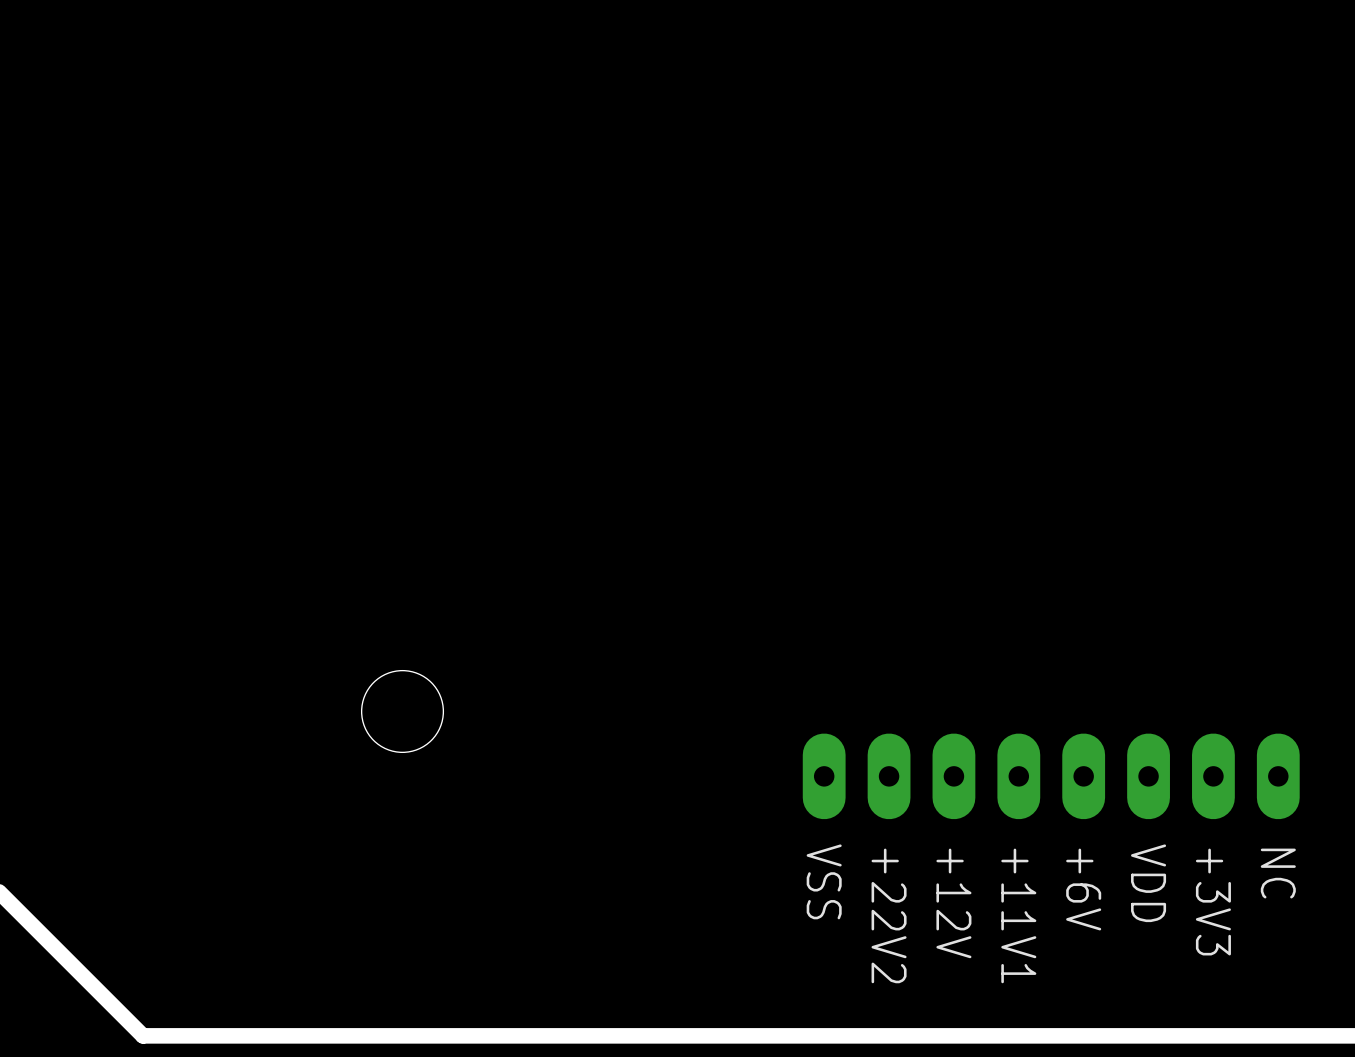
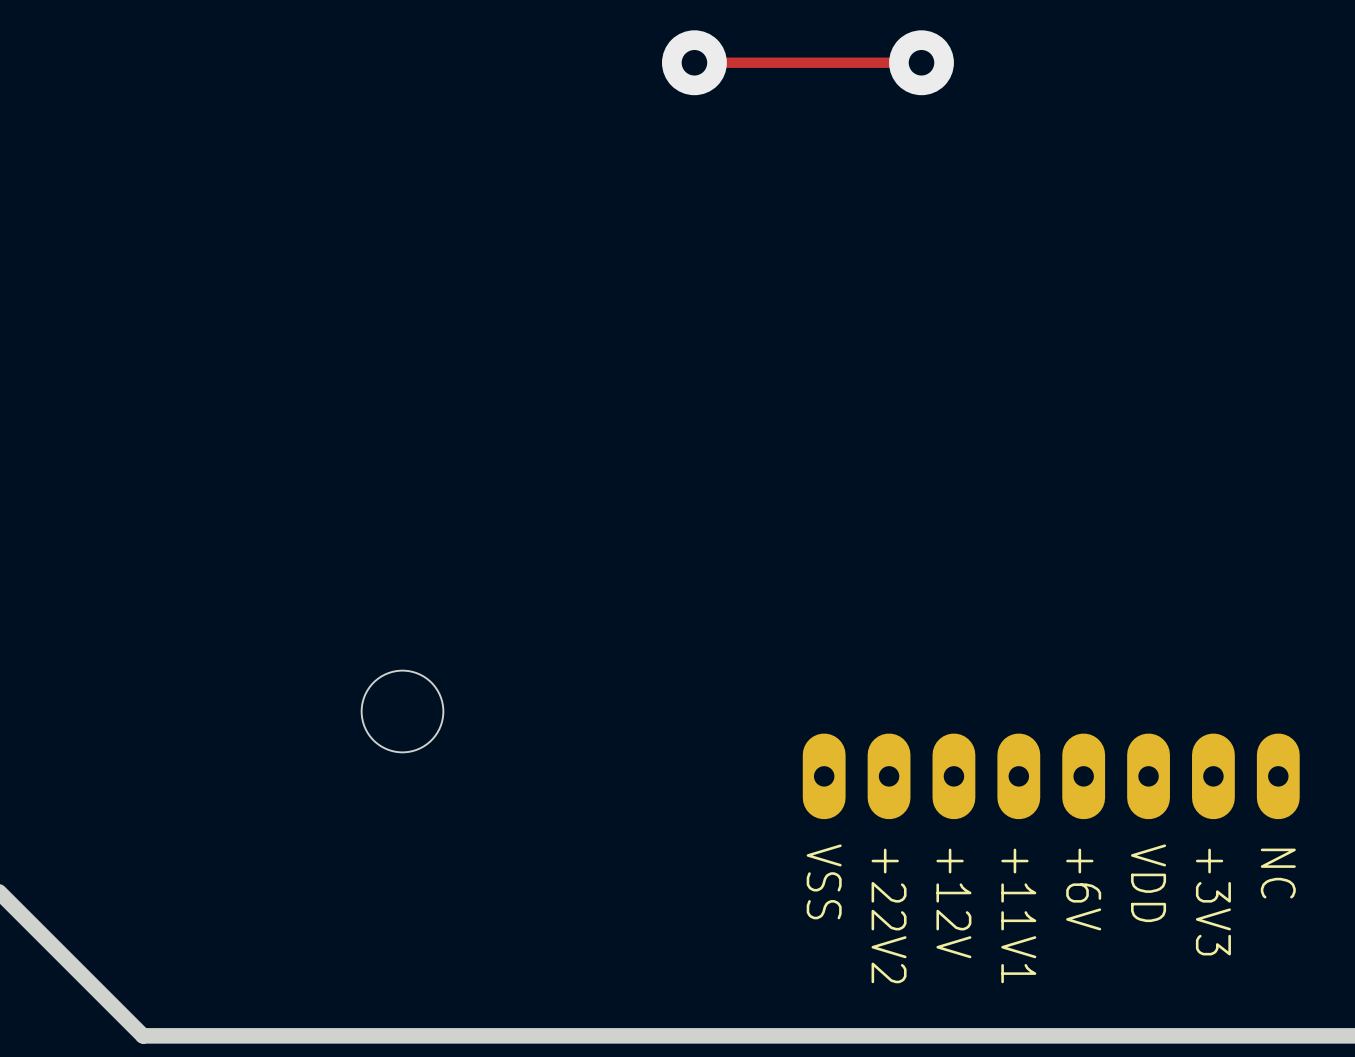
track: none -> (694, 62) (921, 62)
via: none -> (694, 62)
via: none -> (921, 62)

